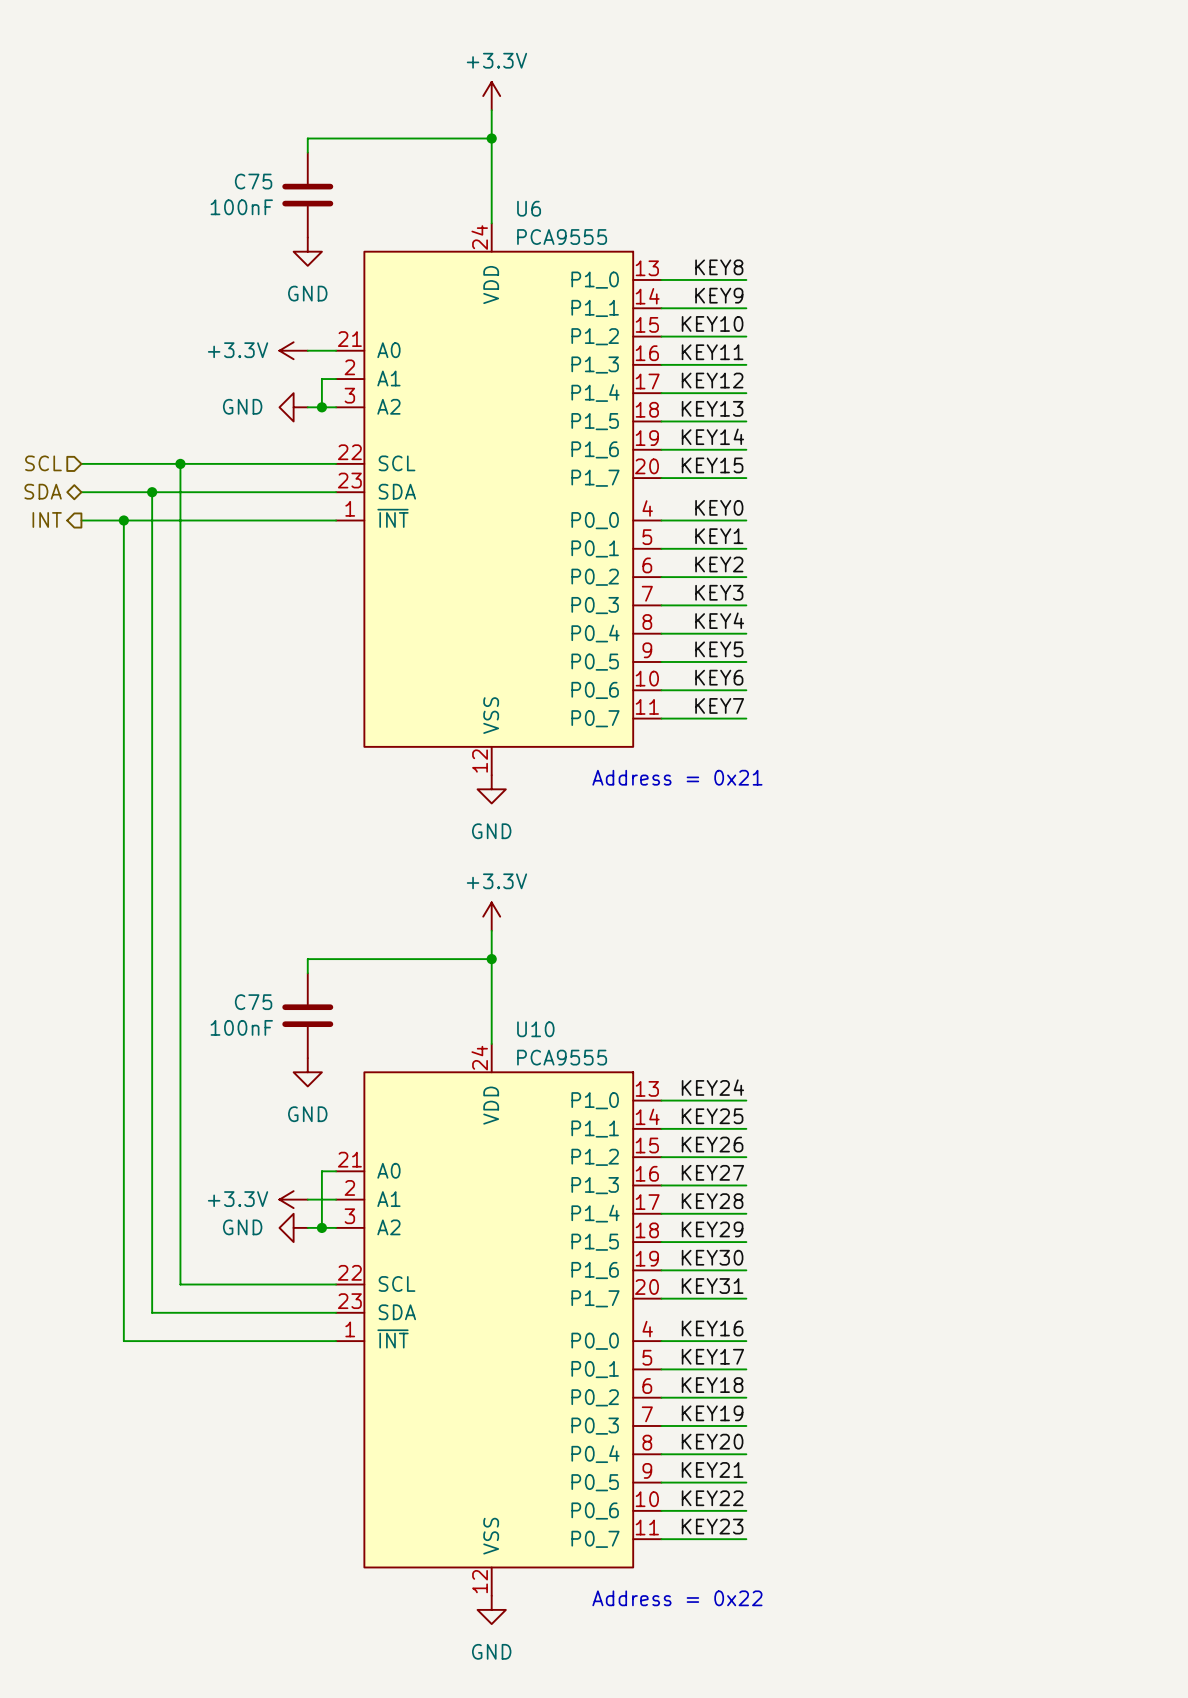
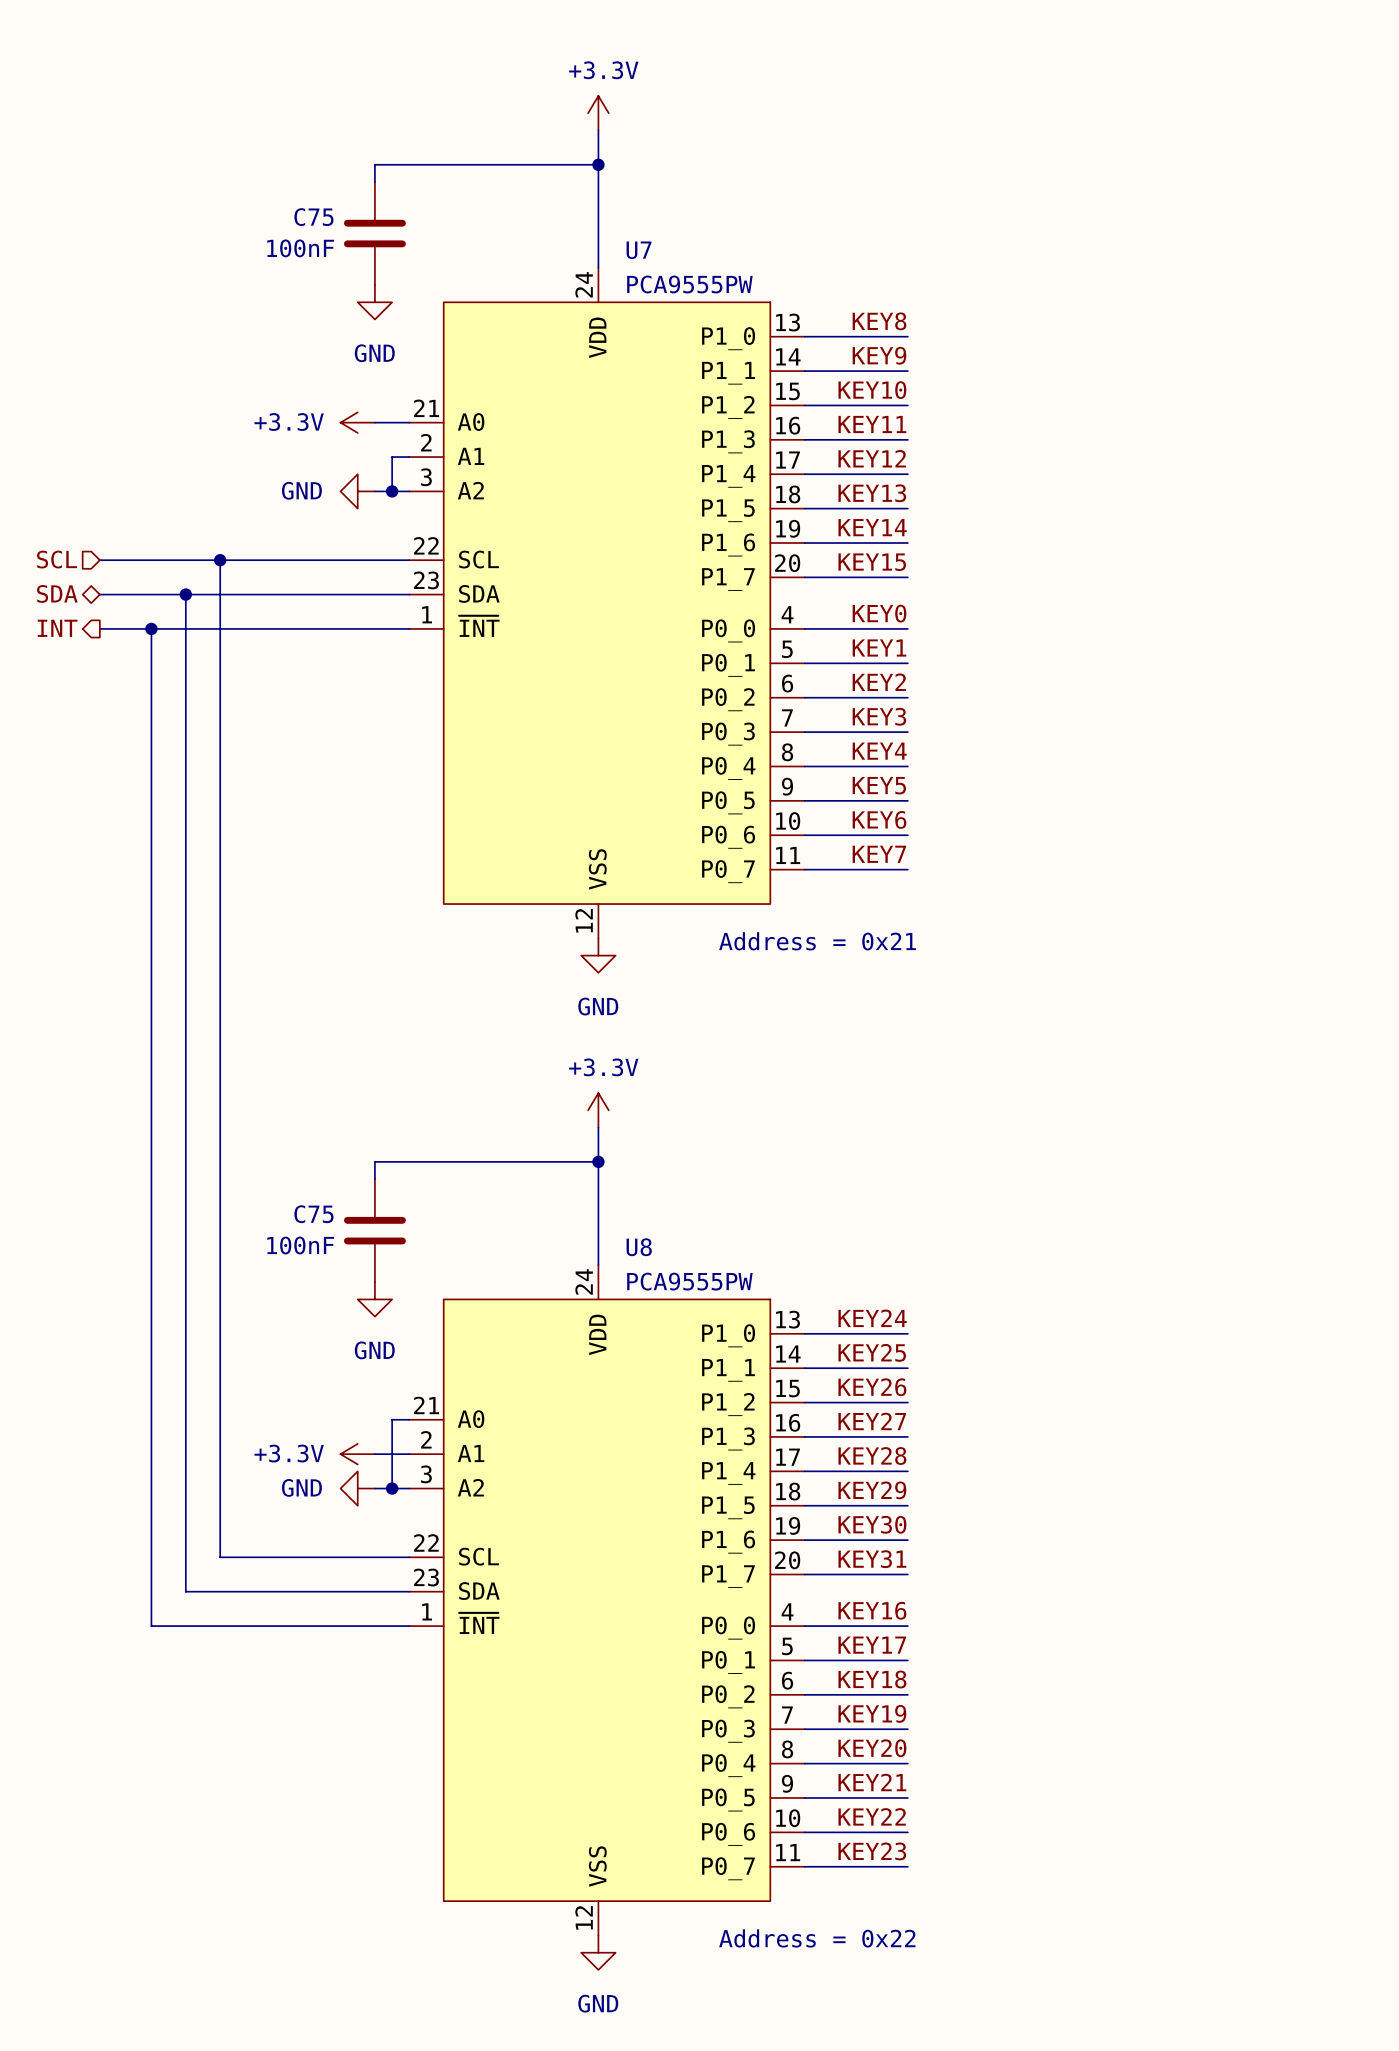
U6 name: U6 (529, 208) -> U7 (639, 250)
U6 value: PCA9555 (562, 237) -> PCA9555PW (689, 284)
U10 name: U10 (535, 1029) -> U8 (639, 1247)
U10 value: PCA9555 (562, 1057) -> PCA9555PW (689, 1281)

